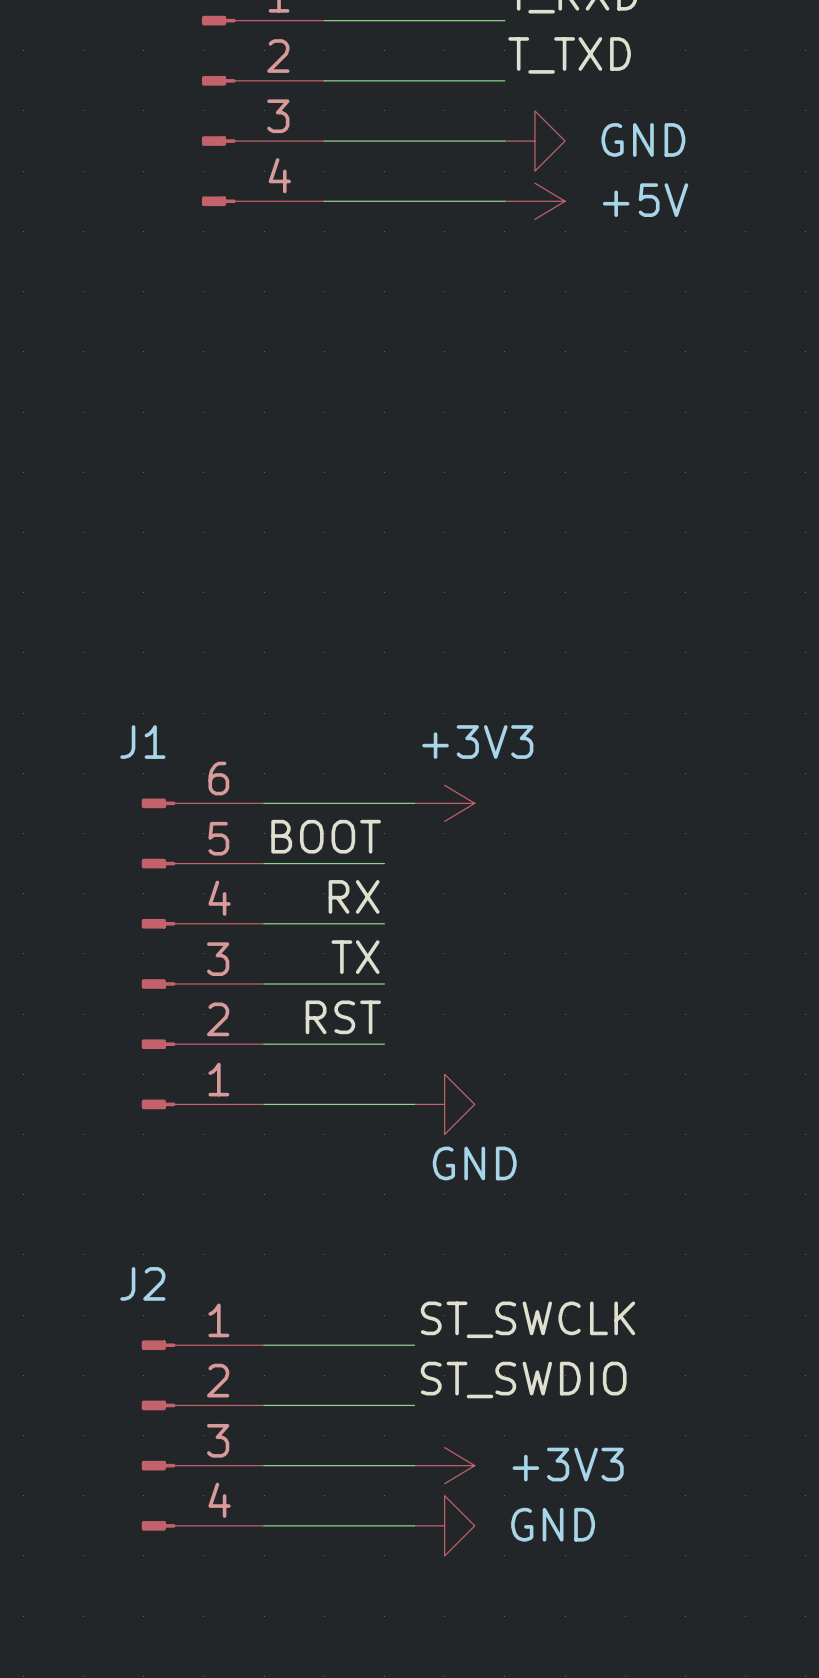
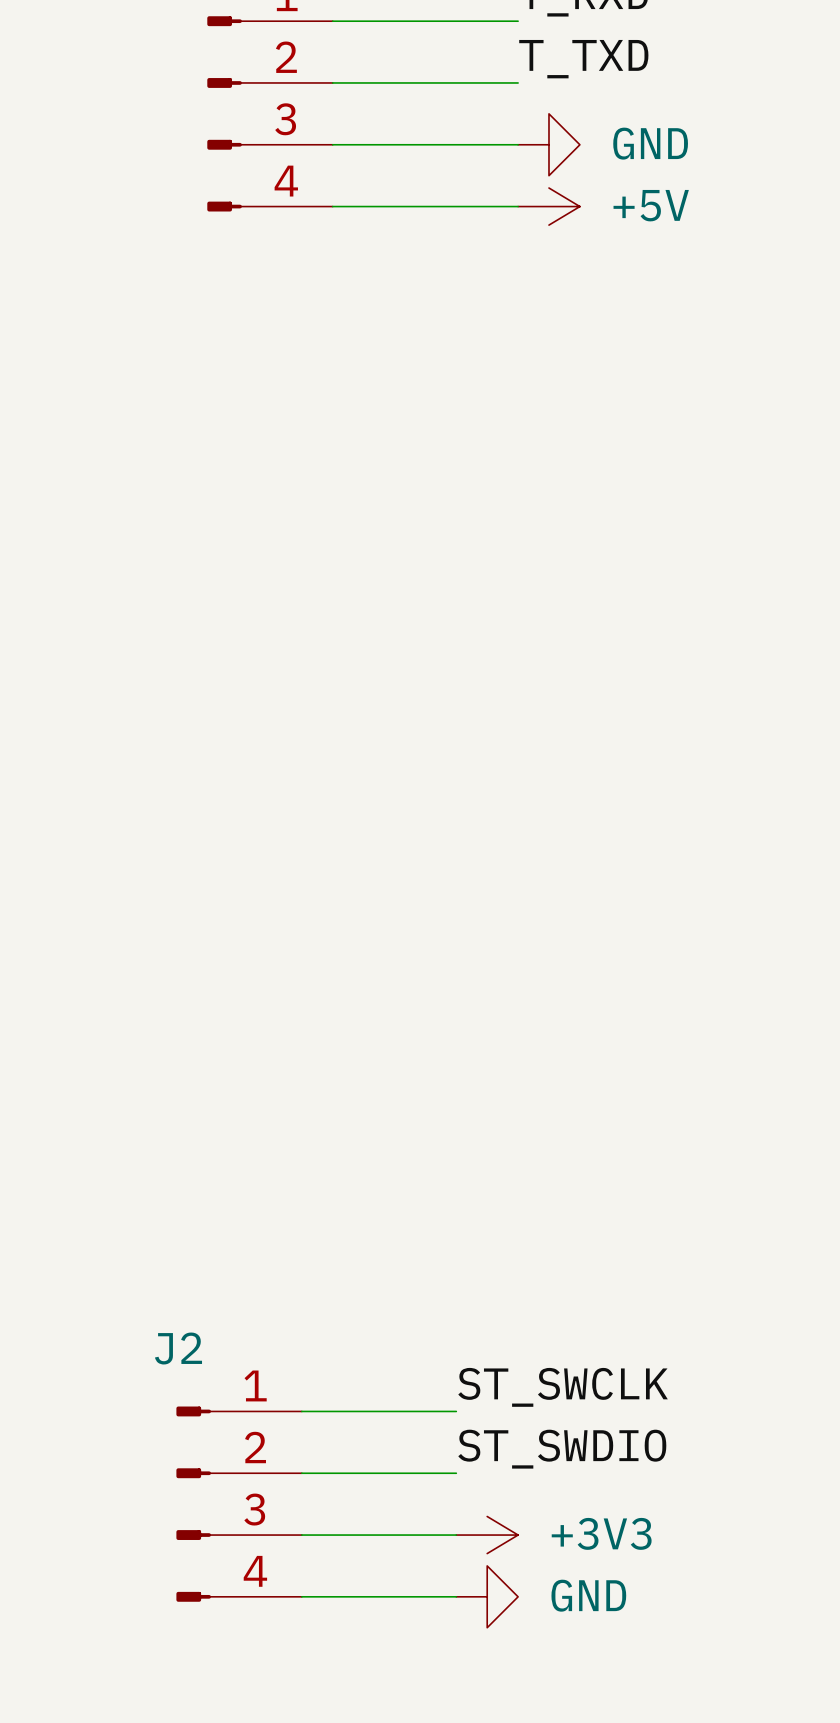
wire: (264, 803) (414, 803) -> none
power symbol: +3V3 (444, 803) -> none
label: BOOT (326, 836) -> none
wire: (264, 863) (384, 863) -> none
label: RX (354, 896) -> none
wire: (264, 923) (384, 923) -> none
J1: (202, 953) -> none
label: TX (355, 957) -> none
wire: (264, 983) (384, 983) -> none
label: RST (343, 1017) -> none
wire: (264, 1044) (384, 1044) -> none
wire: (264, 1104) (414, 1104) -> none
power symbol: GND (444, 1104) -> none
label position: ST_SWCLK (528, 1319) -> ST_SWCLK (563, 1387)
wire: (264, 1345) (414, 1345) -> (301, 1411) (456, 1411)
label position: ST_SWDIO (523, 1380) -> ST_SWDIO (562, 1449)
wire: (264, 1405) (414, 1405) -> (301, 1473) (456, 1473)
J2 position: (202, 1435) -> (239, 1504)
wire: (264, 1465) (414, 1465) -> (301, 1535) (456, 1535)
power symbol position: +3V3 (444, 1465) -> +3V3 (487, 1535)
wire: (264, 1525) (414, 1525) -> (301, 1596) (456, 1596)
power symbol position: GND (444, 1525) -> GND (487, 1596)

